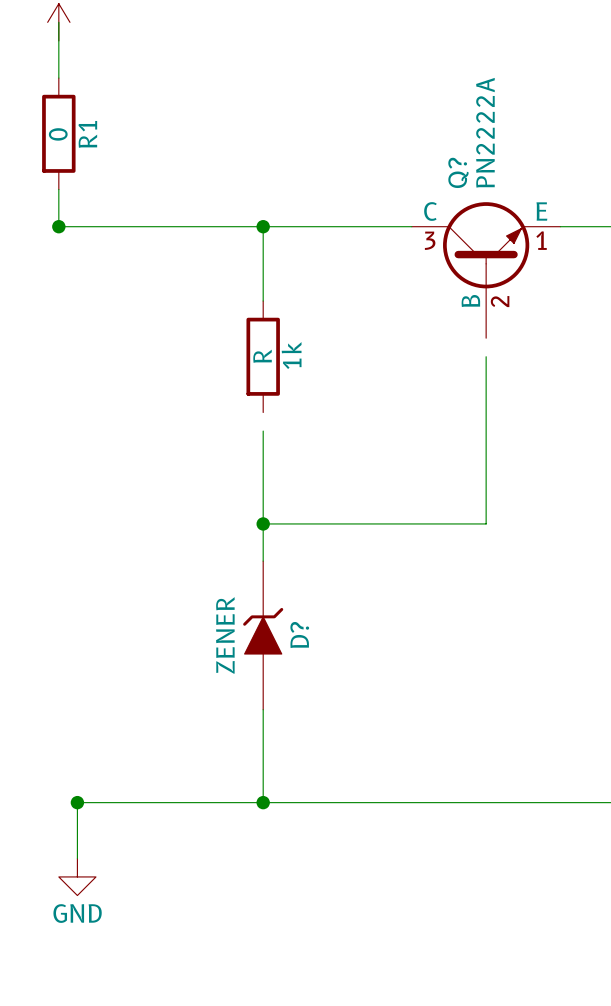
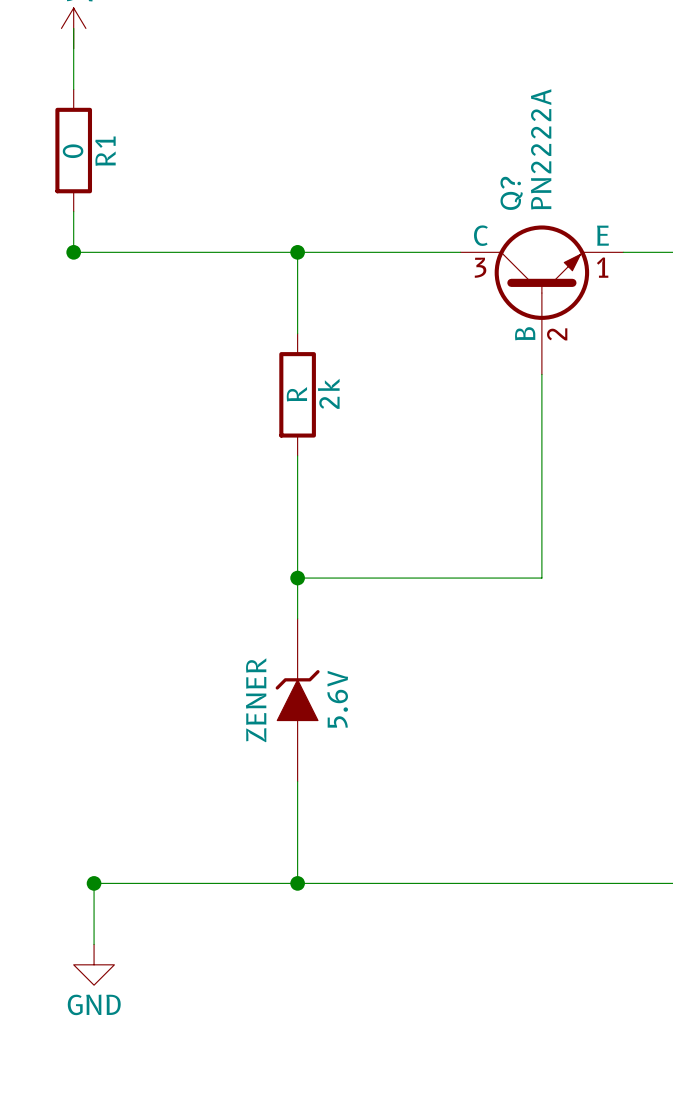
wire: none -> (541, 374) (541, 394)
1k name: 1k (291, 355) -> 2k (328, 393)
wire: none -> (297, 455) (297, 476)
D? name: D? (299, 635) -> 5.6V (337, 699)

